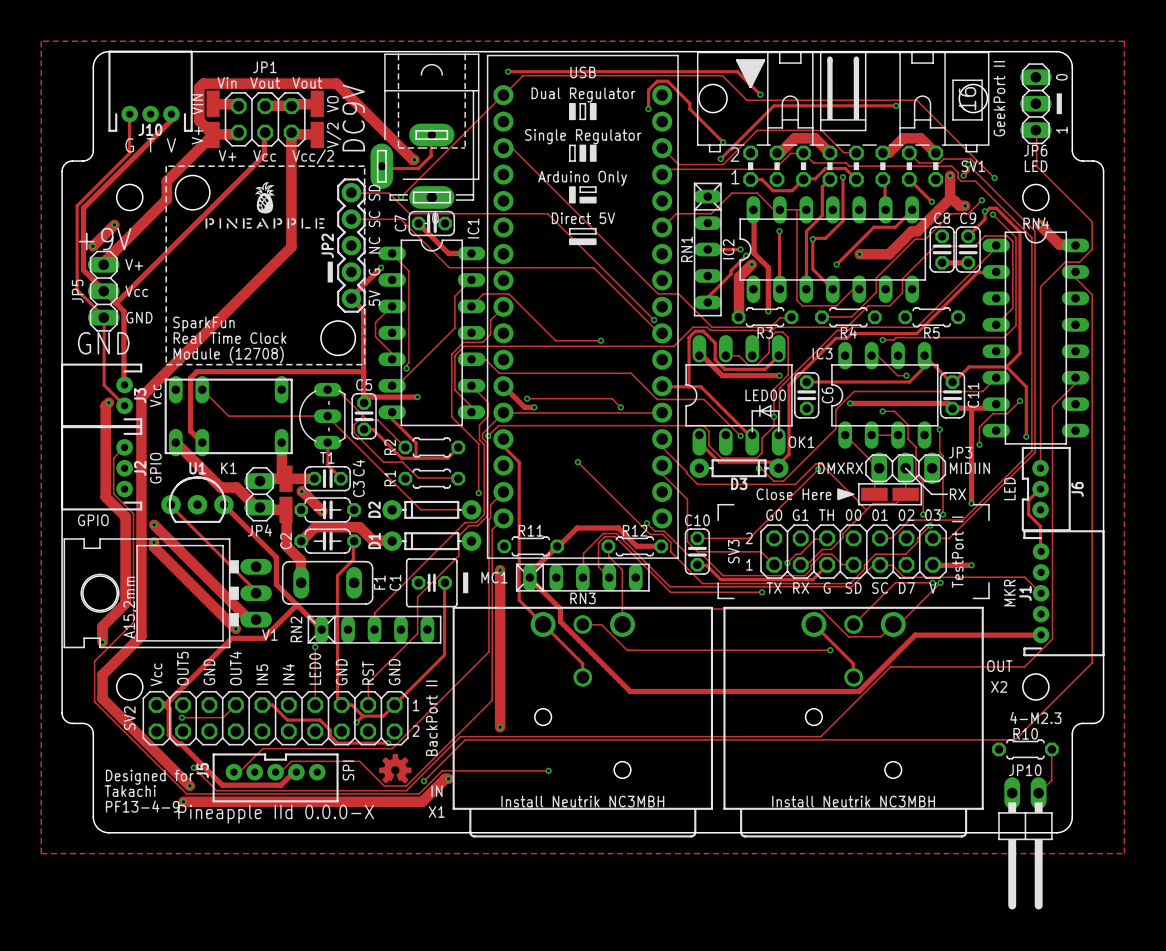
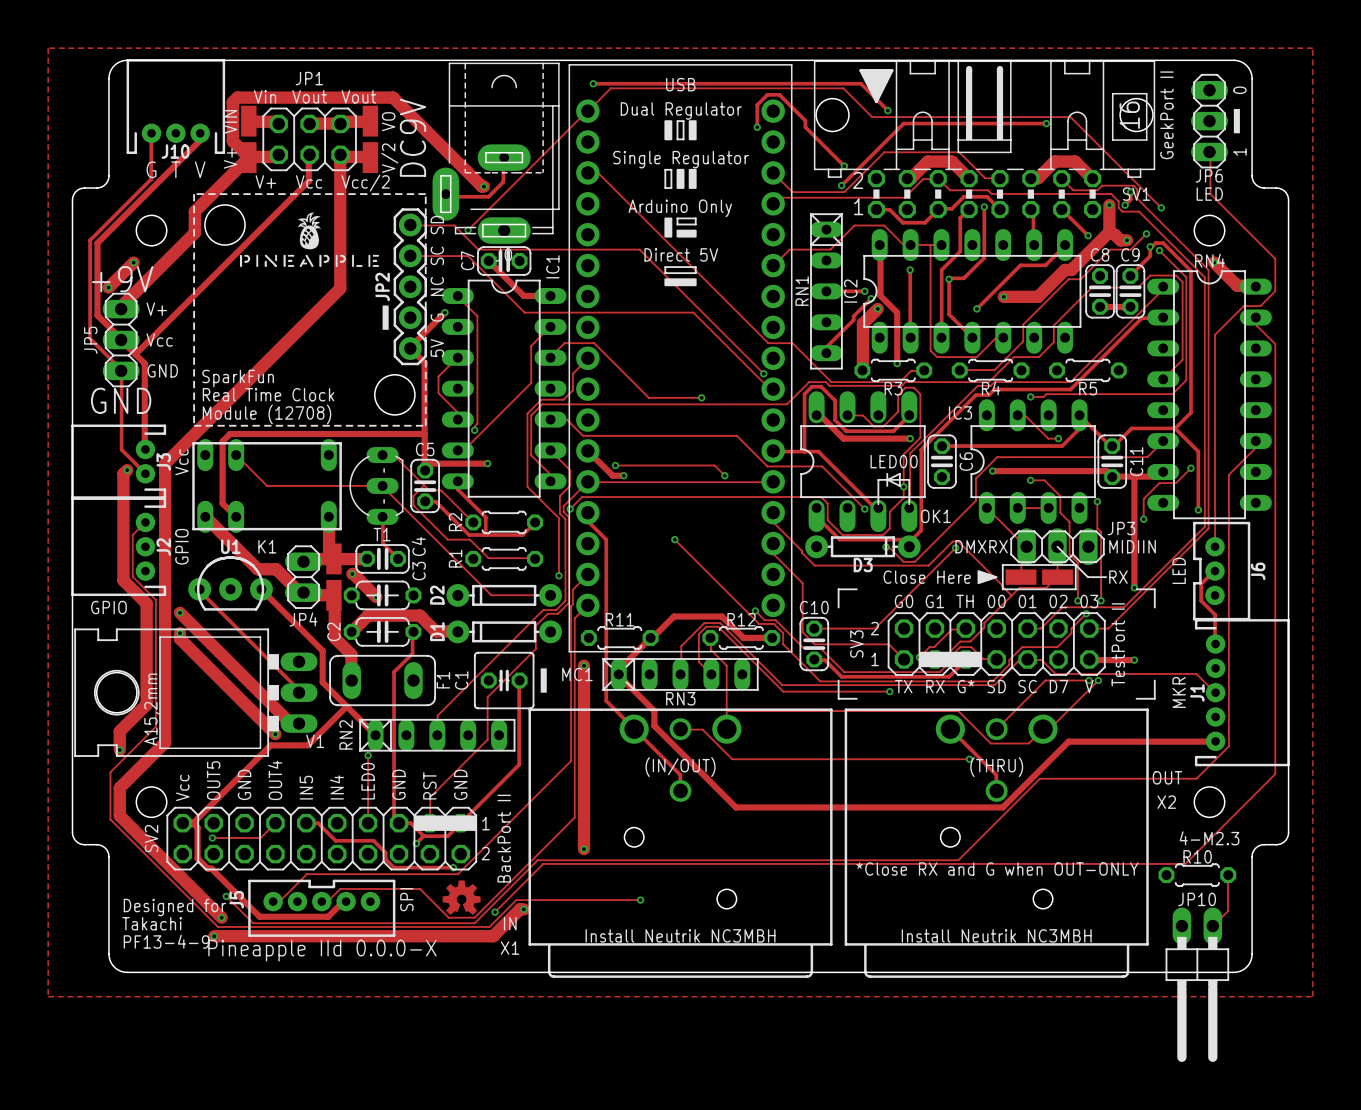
drawing: none -> [919, 651, 982, 668]
text: G (827, 588) -> G* (966, 686)
text: none -> (IN/OUT) (680, 767)
text: none -> (THRU) (996, 767)
drawing: none -> [414, 815, 477, 831]
text: none -> *Close RX and G when OUT-ONLY (997, 869)

